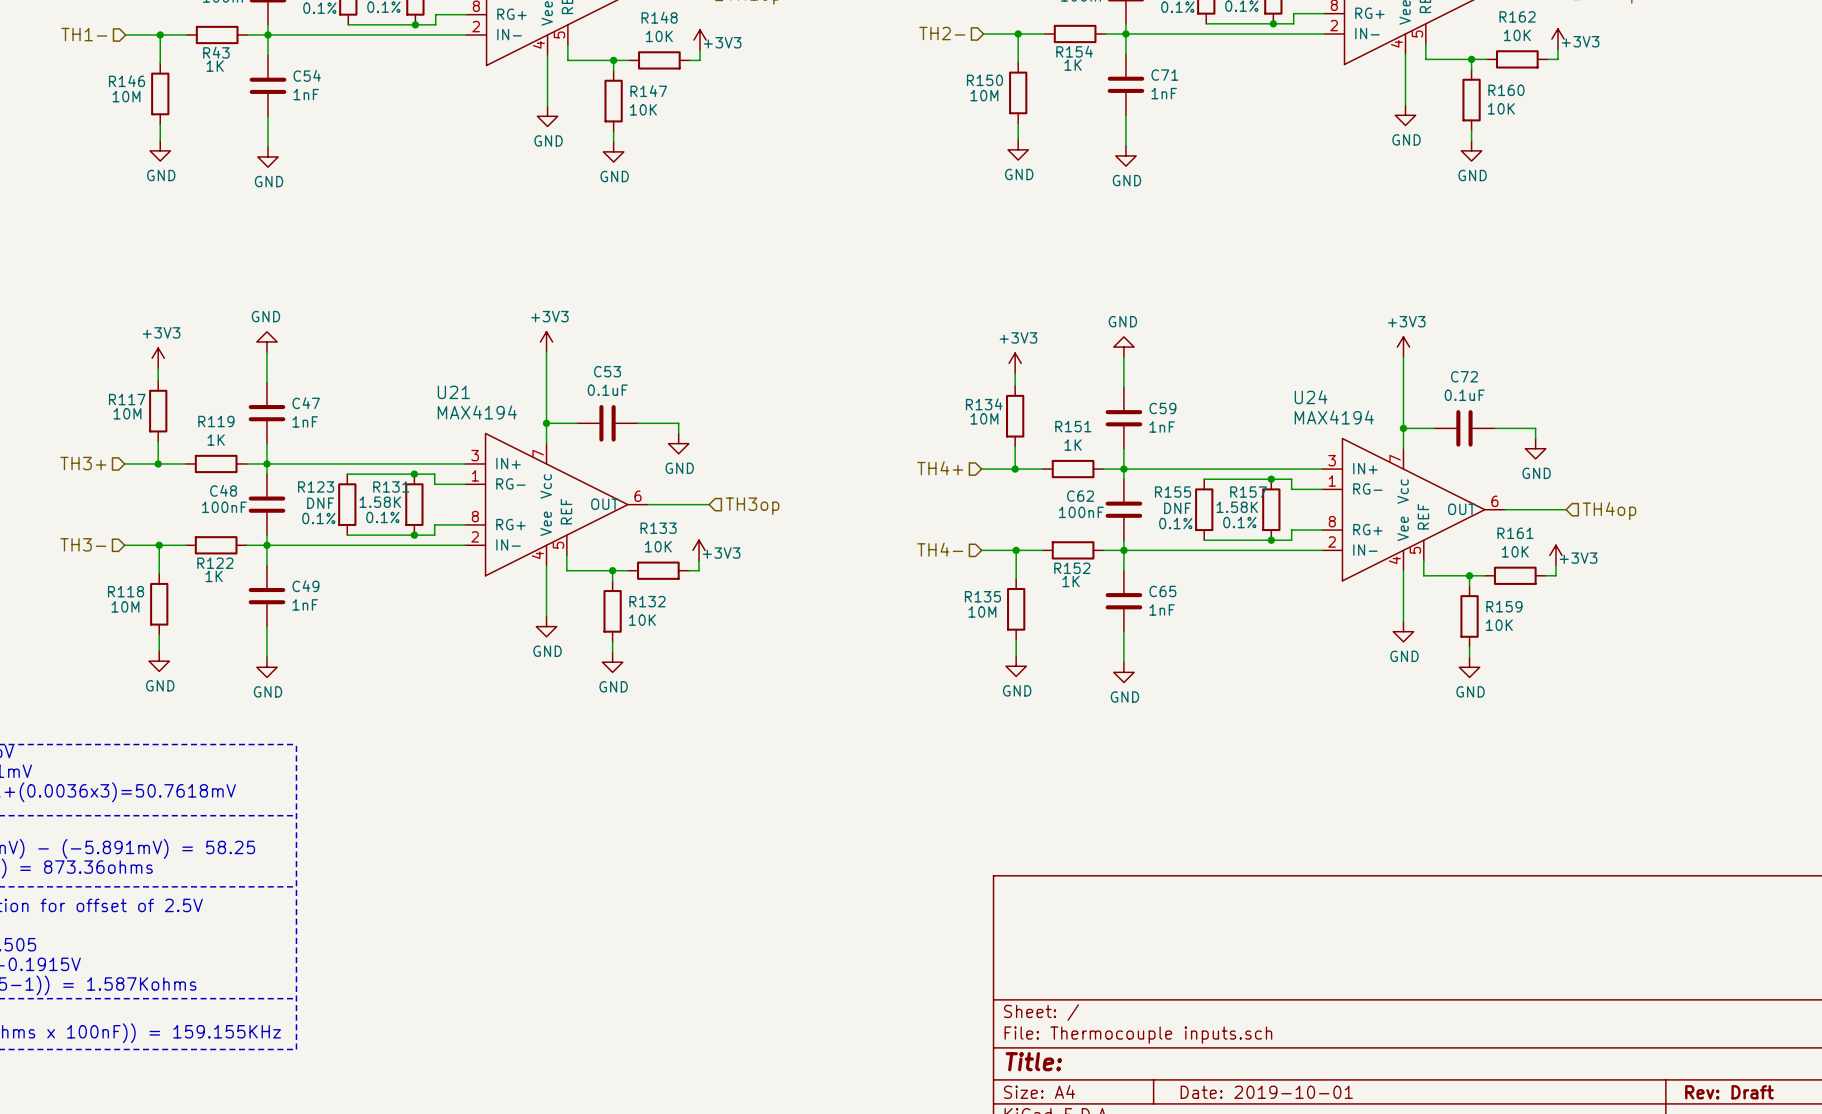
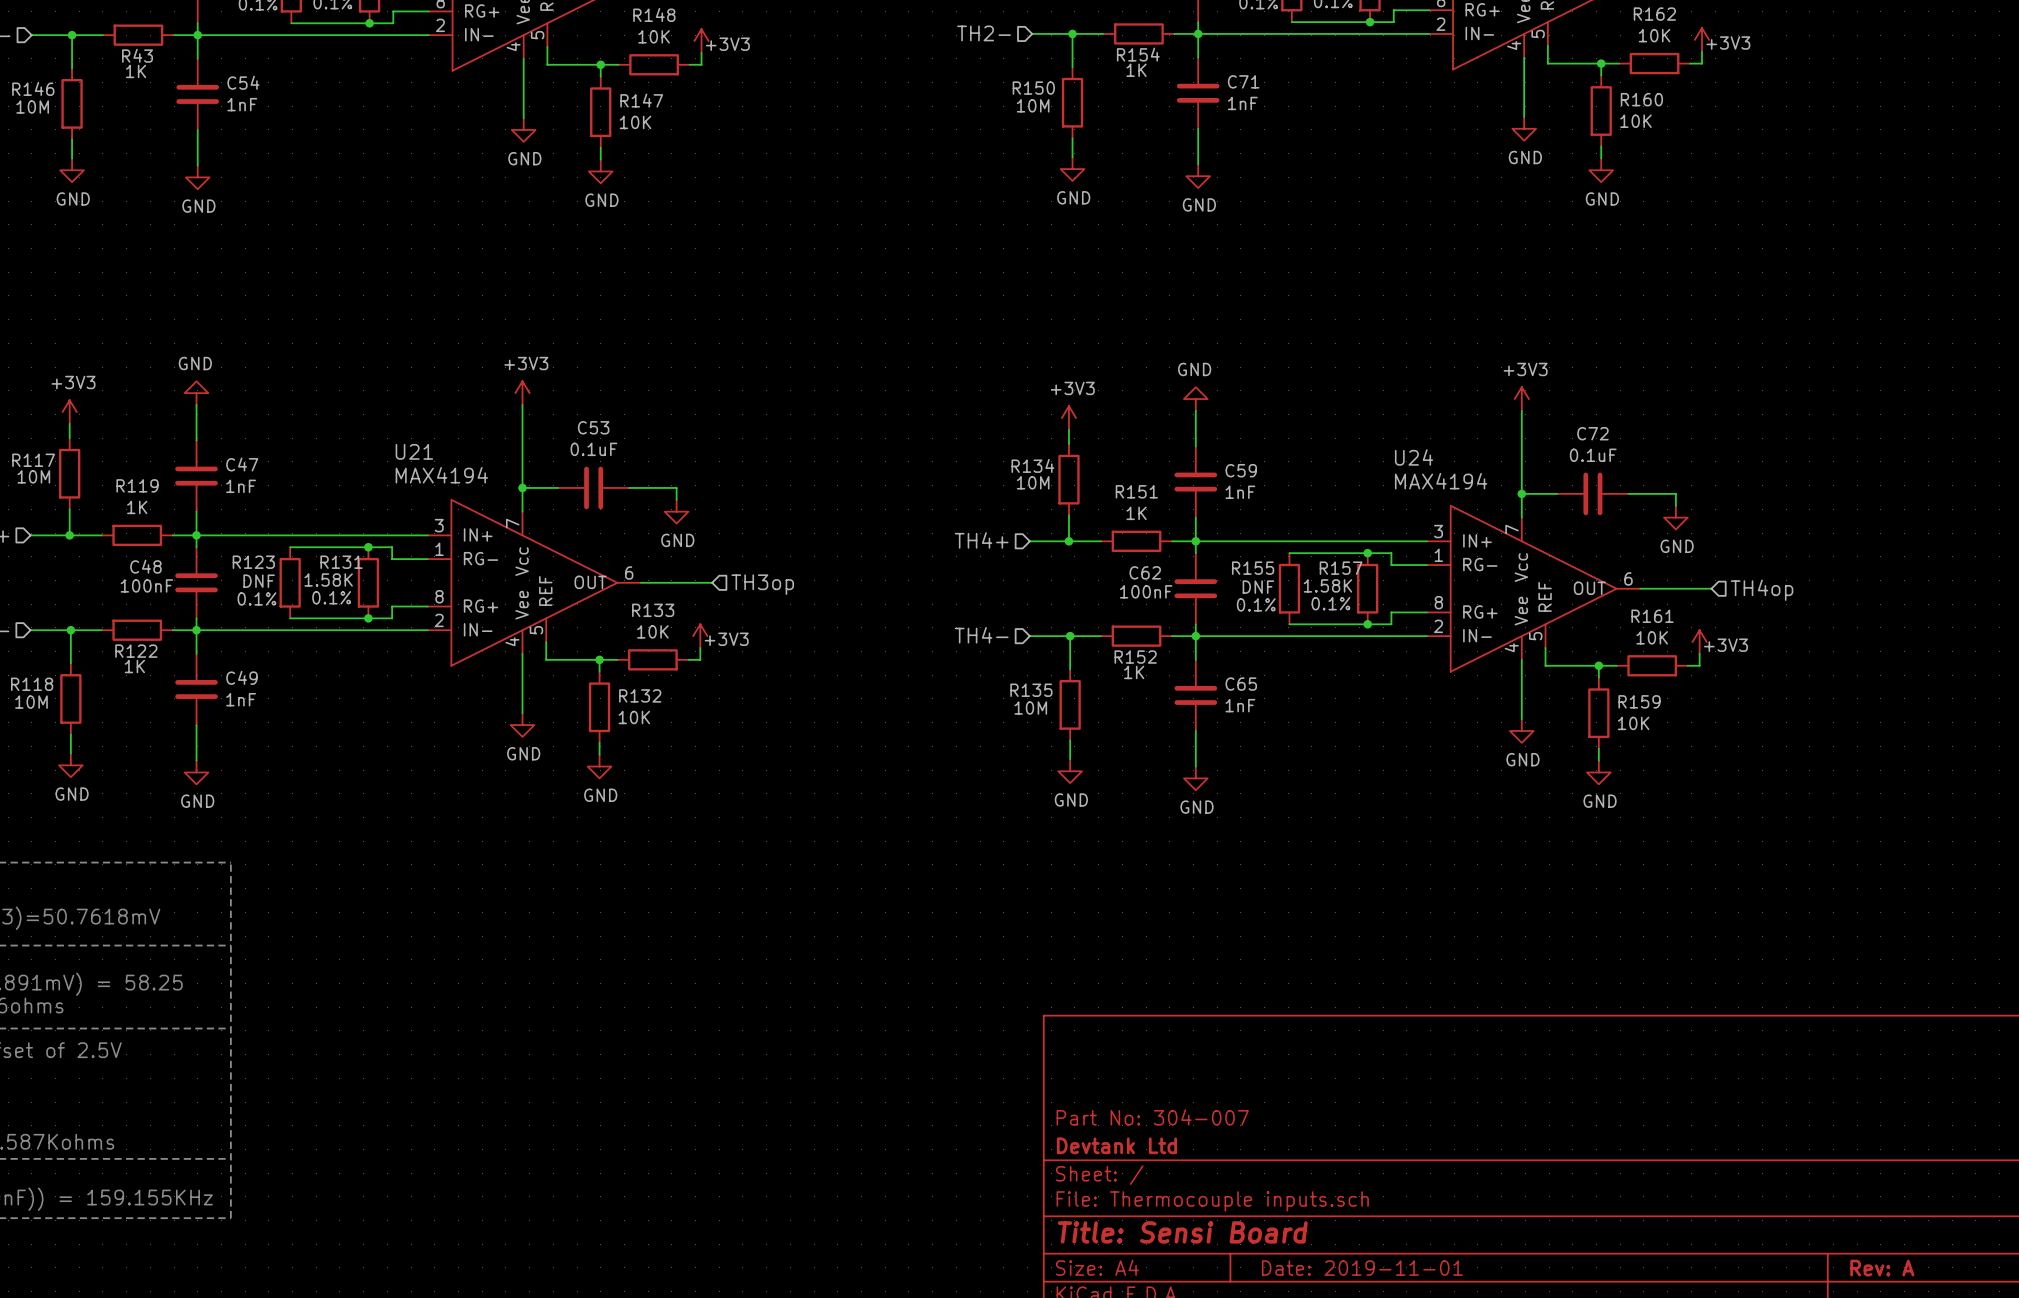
title block: none -> Part No: 304-007 (1152, 1117)
title block: none -> Devtank Ltd (1116, 1145)
title block: Title: (1033, 1061) -> Title: Sensi Board (1182, 1232)
title block: Date: 2019-10-01 (1266, 1092) -> Date: 2019-11-01 (1362, 1268)
title block: Rev: Draft (1729, 1092) -> Rev: A (1882, 1268)

